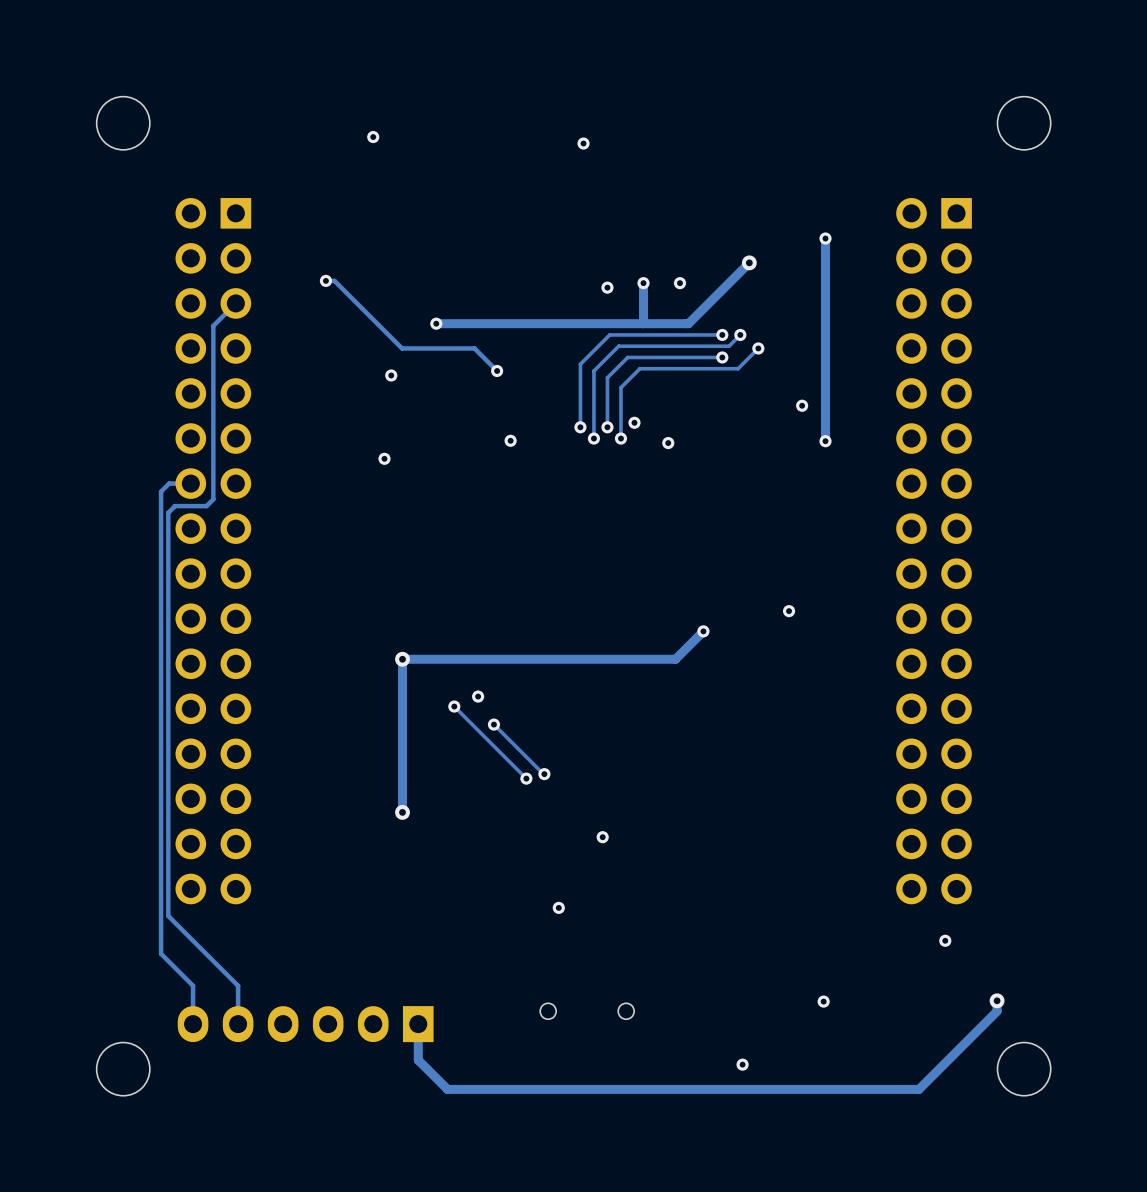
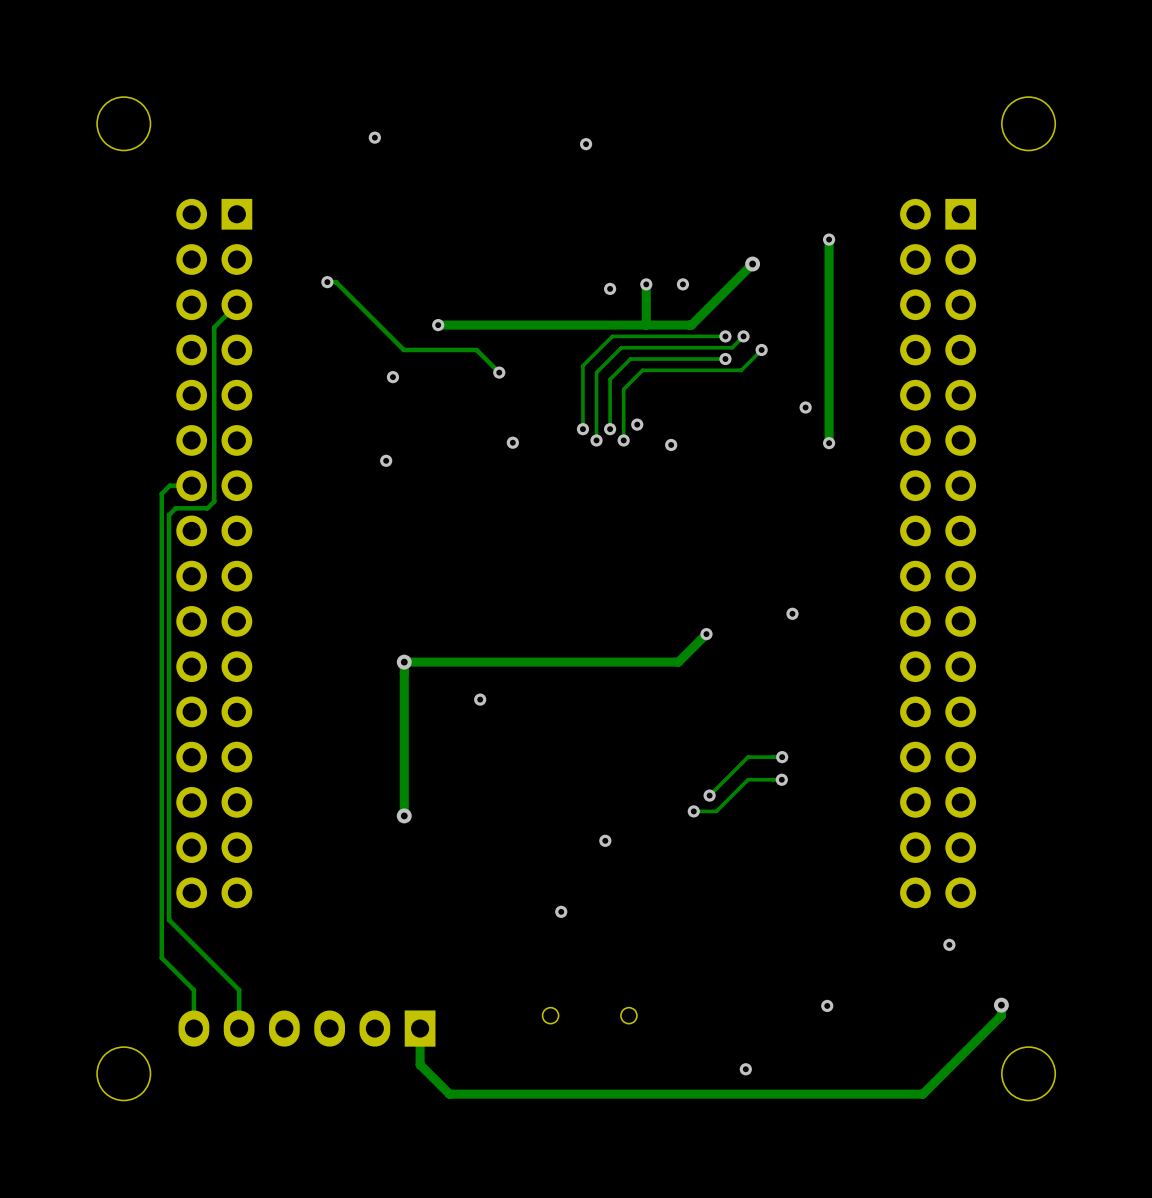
track: (454, 706) (526, 778) -> none
via: (454, 706) -> none
track: (493, 724) (544, 774) -> none
via: (493, 724) -> none
track: none -> (782, 757) (748, 757) (709, 795)
via: none -> (782, 757)
via: (544, 774) -> none
track: none -> (781, 779) (748, 779) (716, 811) (693, 811)
via: none -> (781, 779)
via: (526, 778) -> none
via: none -> (709, 795)
via: none -> (693, 811)

